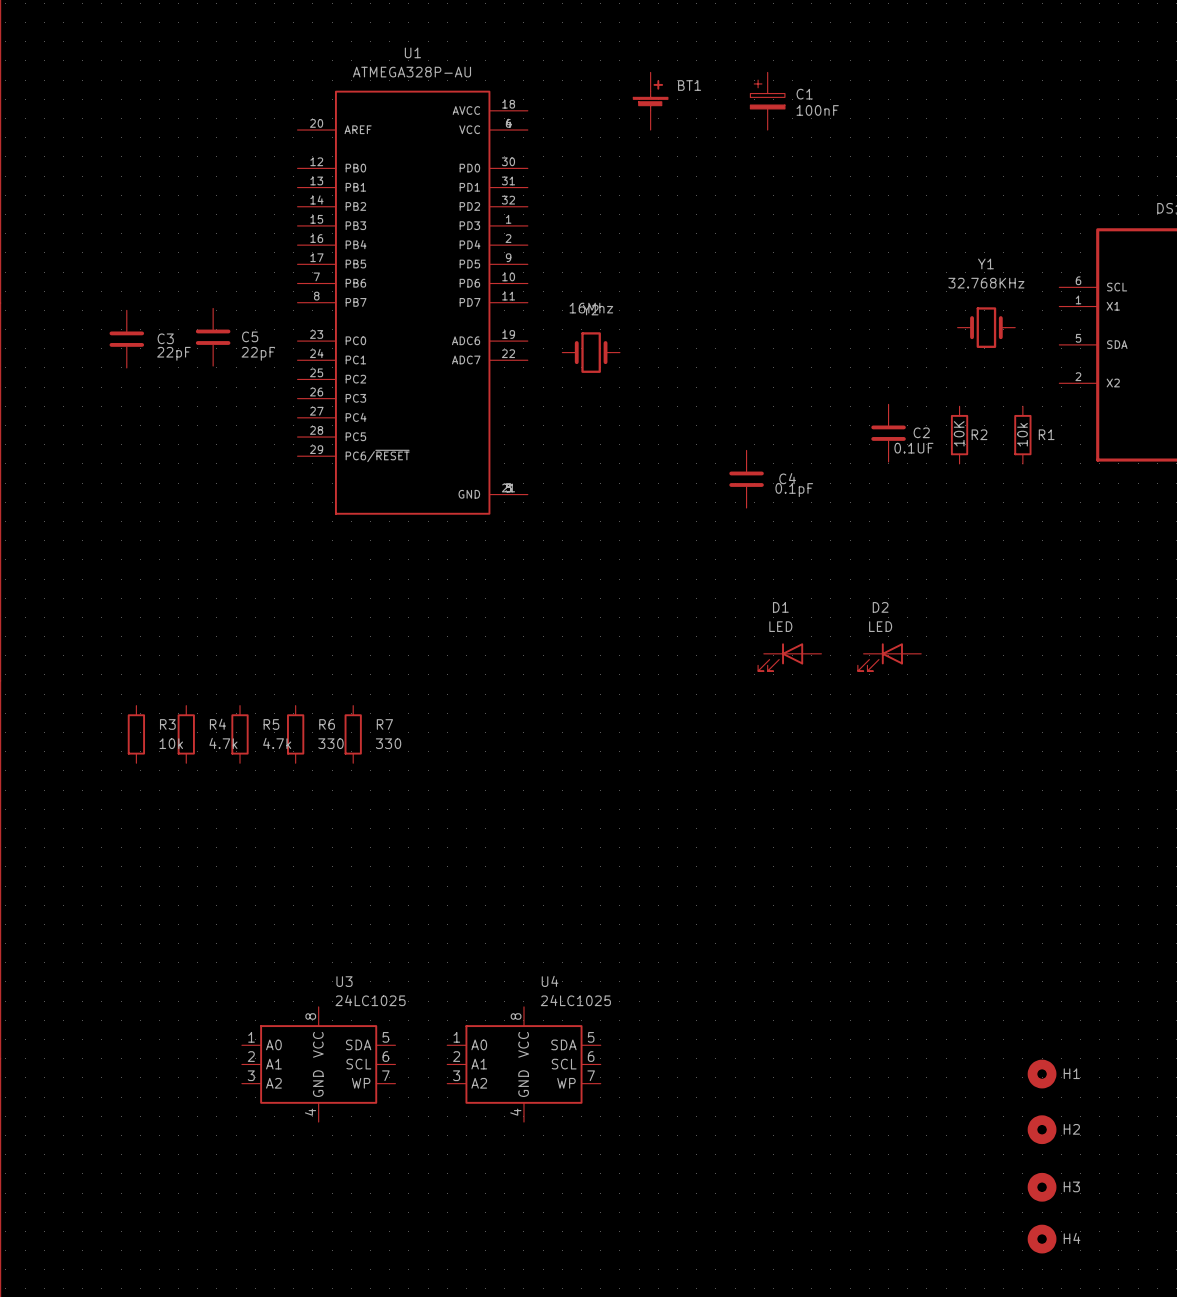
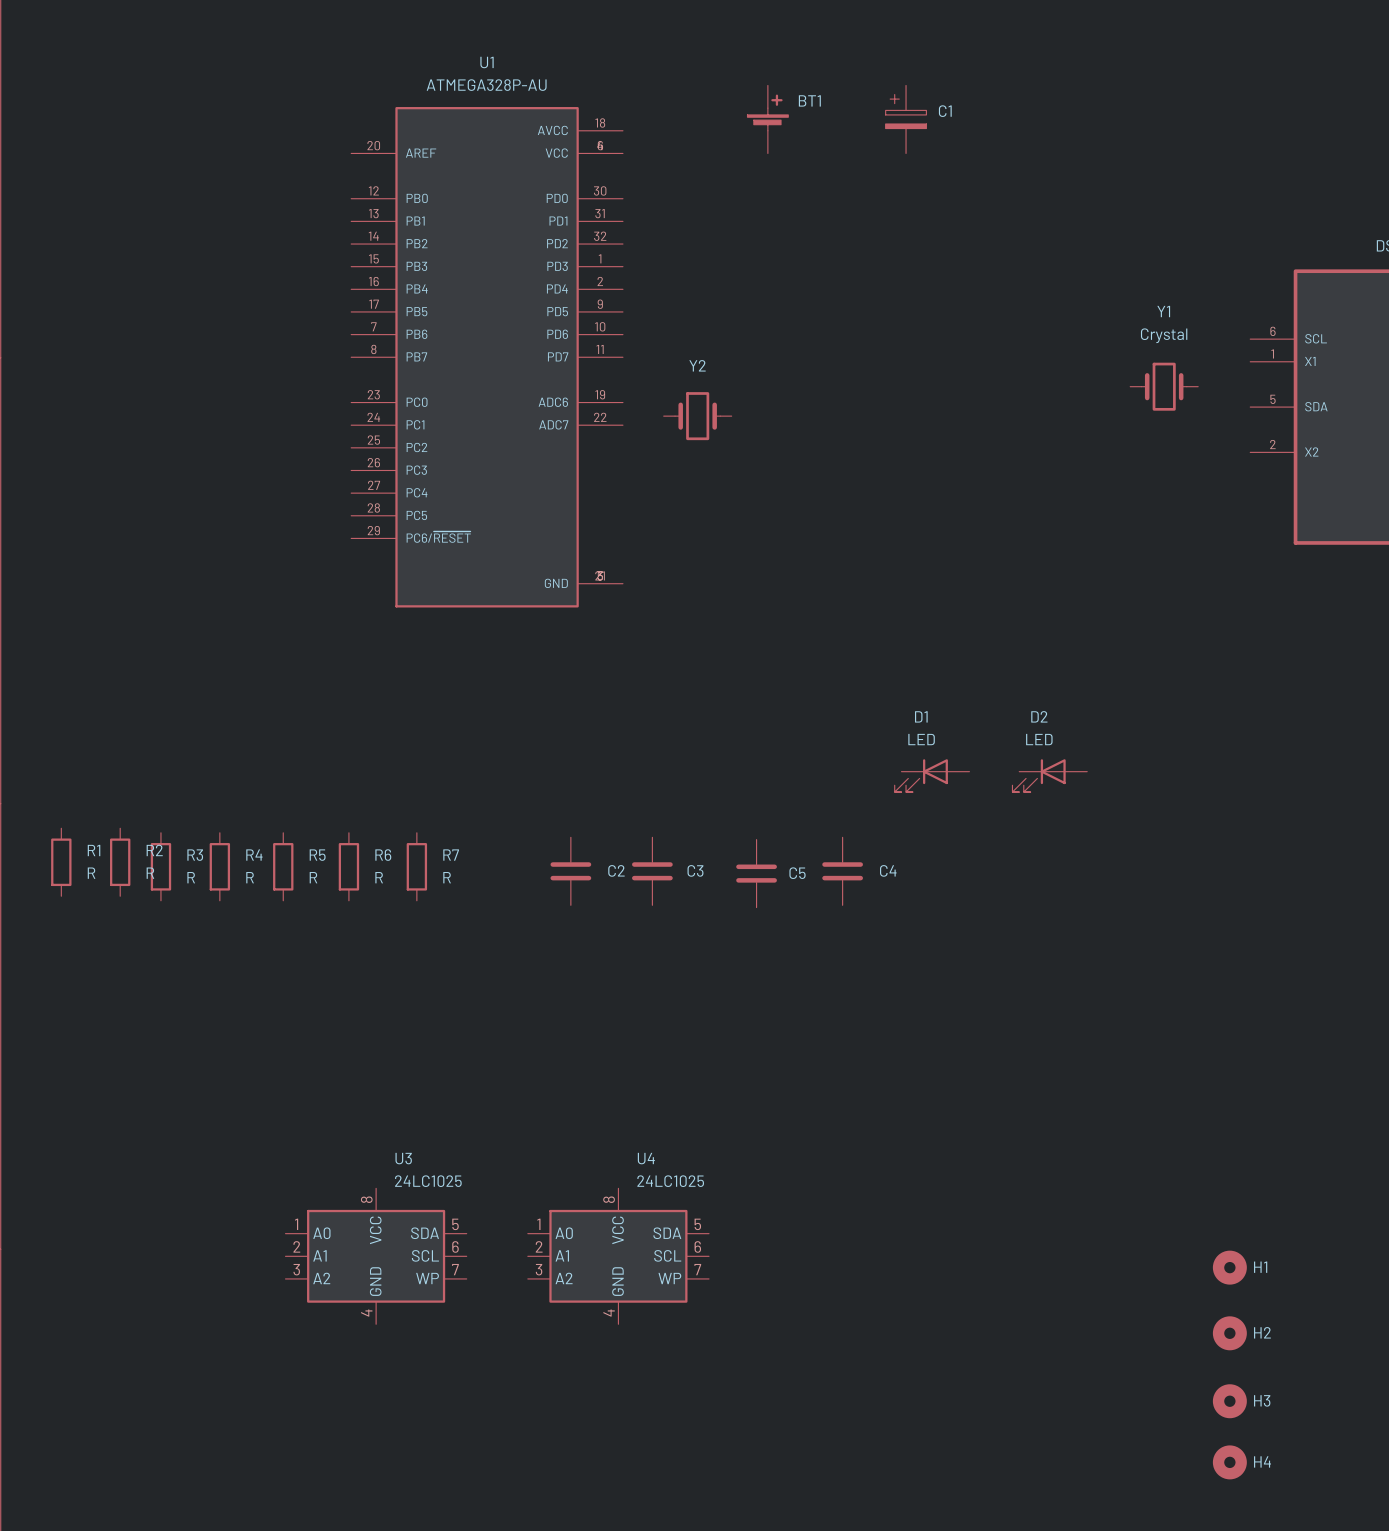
C1 value: 100nF (817, 110) -> none
Y1 value: 32.768KHz (986, 283) -> Crystal (1164, 335)
Y2 value: 16Mhz (591, 308) -> none
C5 position: (213, 337) -> (756, 873)
C3 position: (126, 339) -> (652, 871)
C3 value: 22pF (173, 353) -> none
C5 value: 22pF (258, 353) -> none
C2 name position: C2 (921, 432) -> C2 (616, 870)
C2 position: (888, 433) -> (570, 871)
R2 value: 10K (959, 433) -> R (150, 873)
R2 name position: R2 (979, 434) -> R2 (154, 850)
R1 value: 10k (1022, 434) -> R (91, 873)
R1 name position: R1 (1046, 434) -> R1 (94, 850)
R2 position: (959, 435) -> (120, 862)
R1 position: (1022, 435) -> (61, 862)
C2 value: 0.1UF (913, 448) -> none
C4 position: (746, 479) -> (842, 871)
C4 value: 0.1pF (794, 490) -> none
R3 value: 10k (171, 743) -> R (191, 877)
R4 value: 4.7k (223, 743) -> R (250, 877)
R5 value: 4.7k (277, 743) -> R (313, 877)
R6 value: 330 (330, 743) -> R (379, 877)
R7 value: 330 (388, 743) -> R (447, 877)

